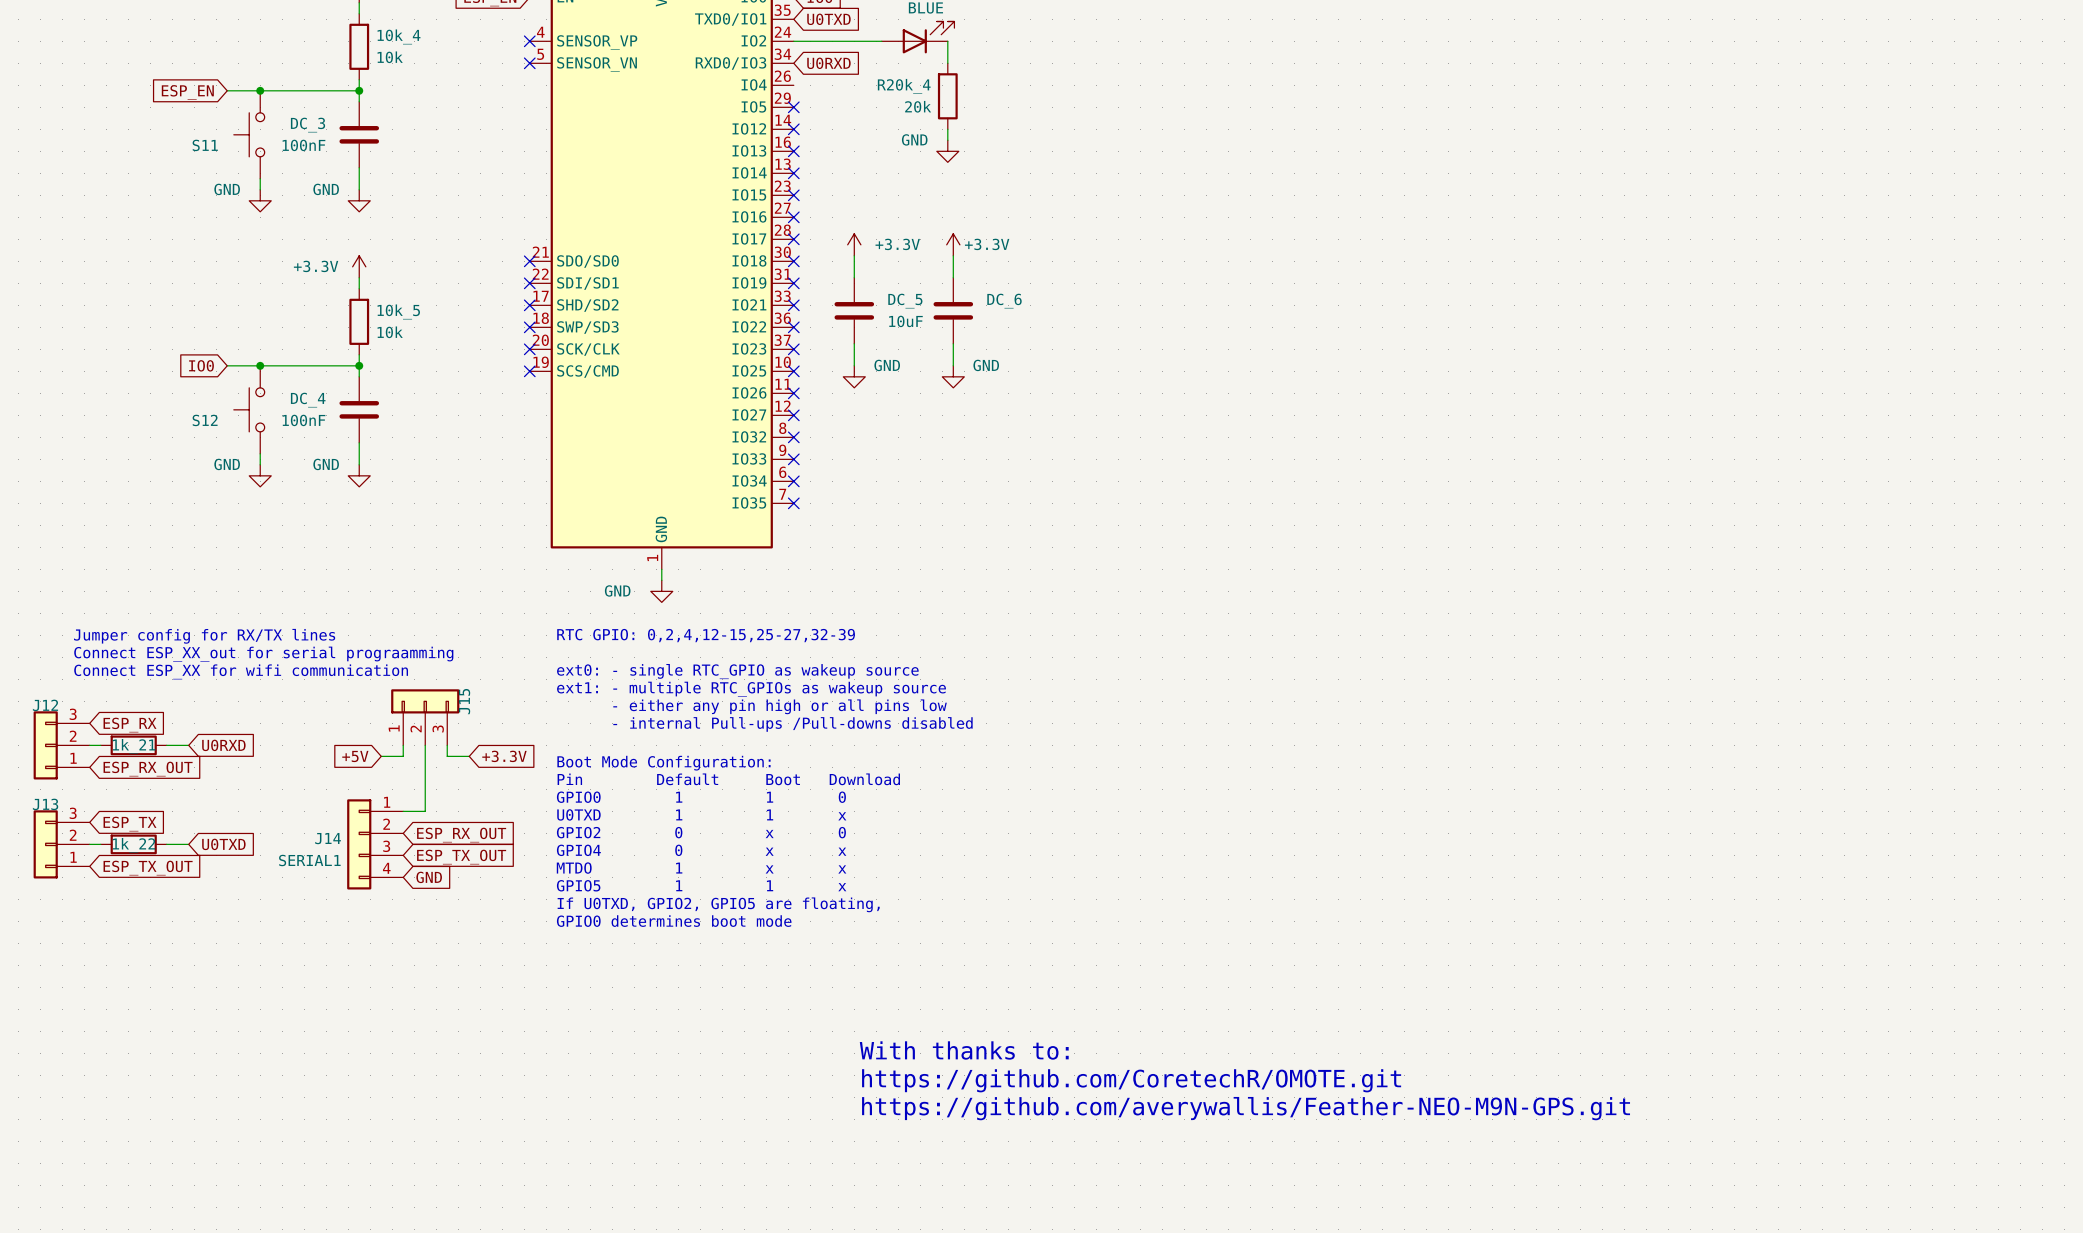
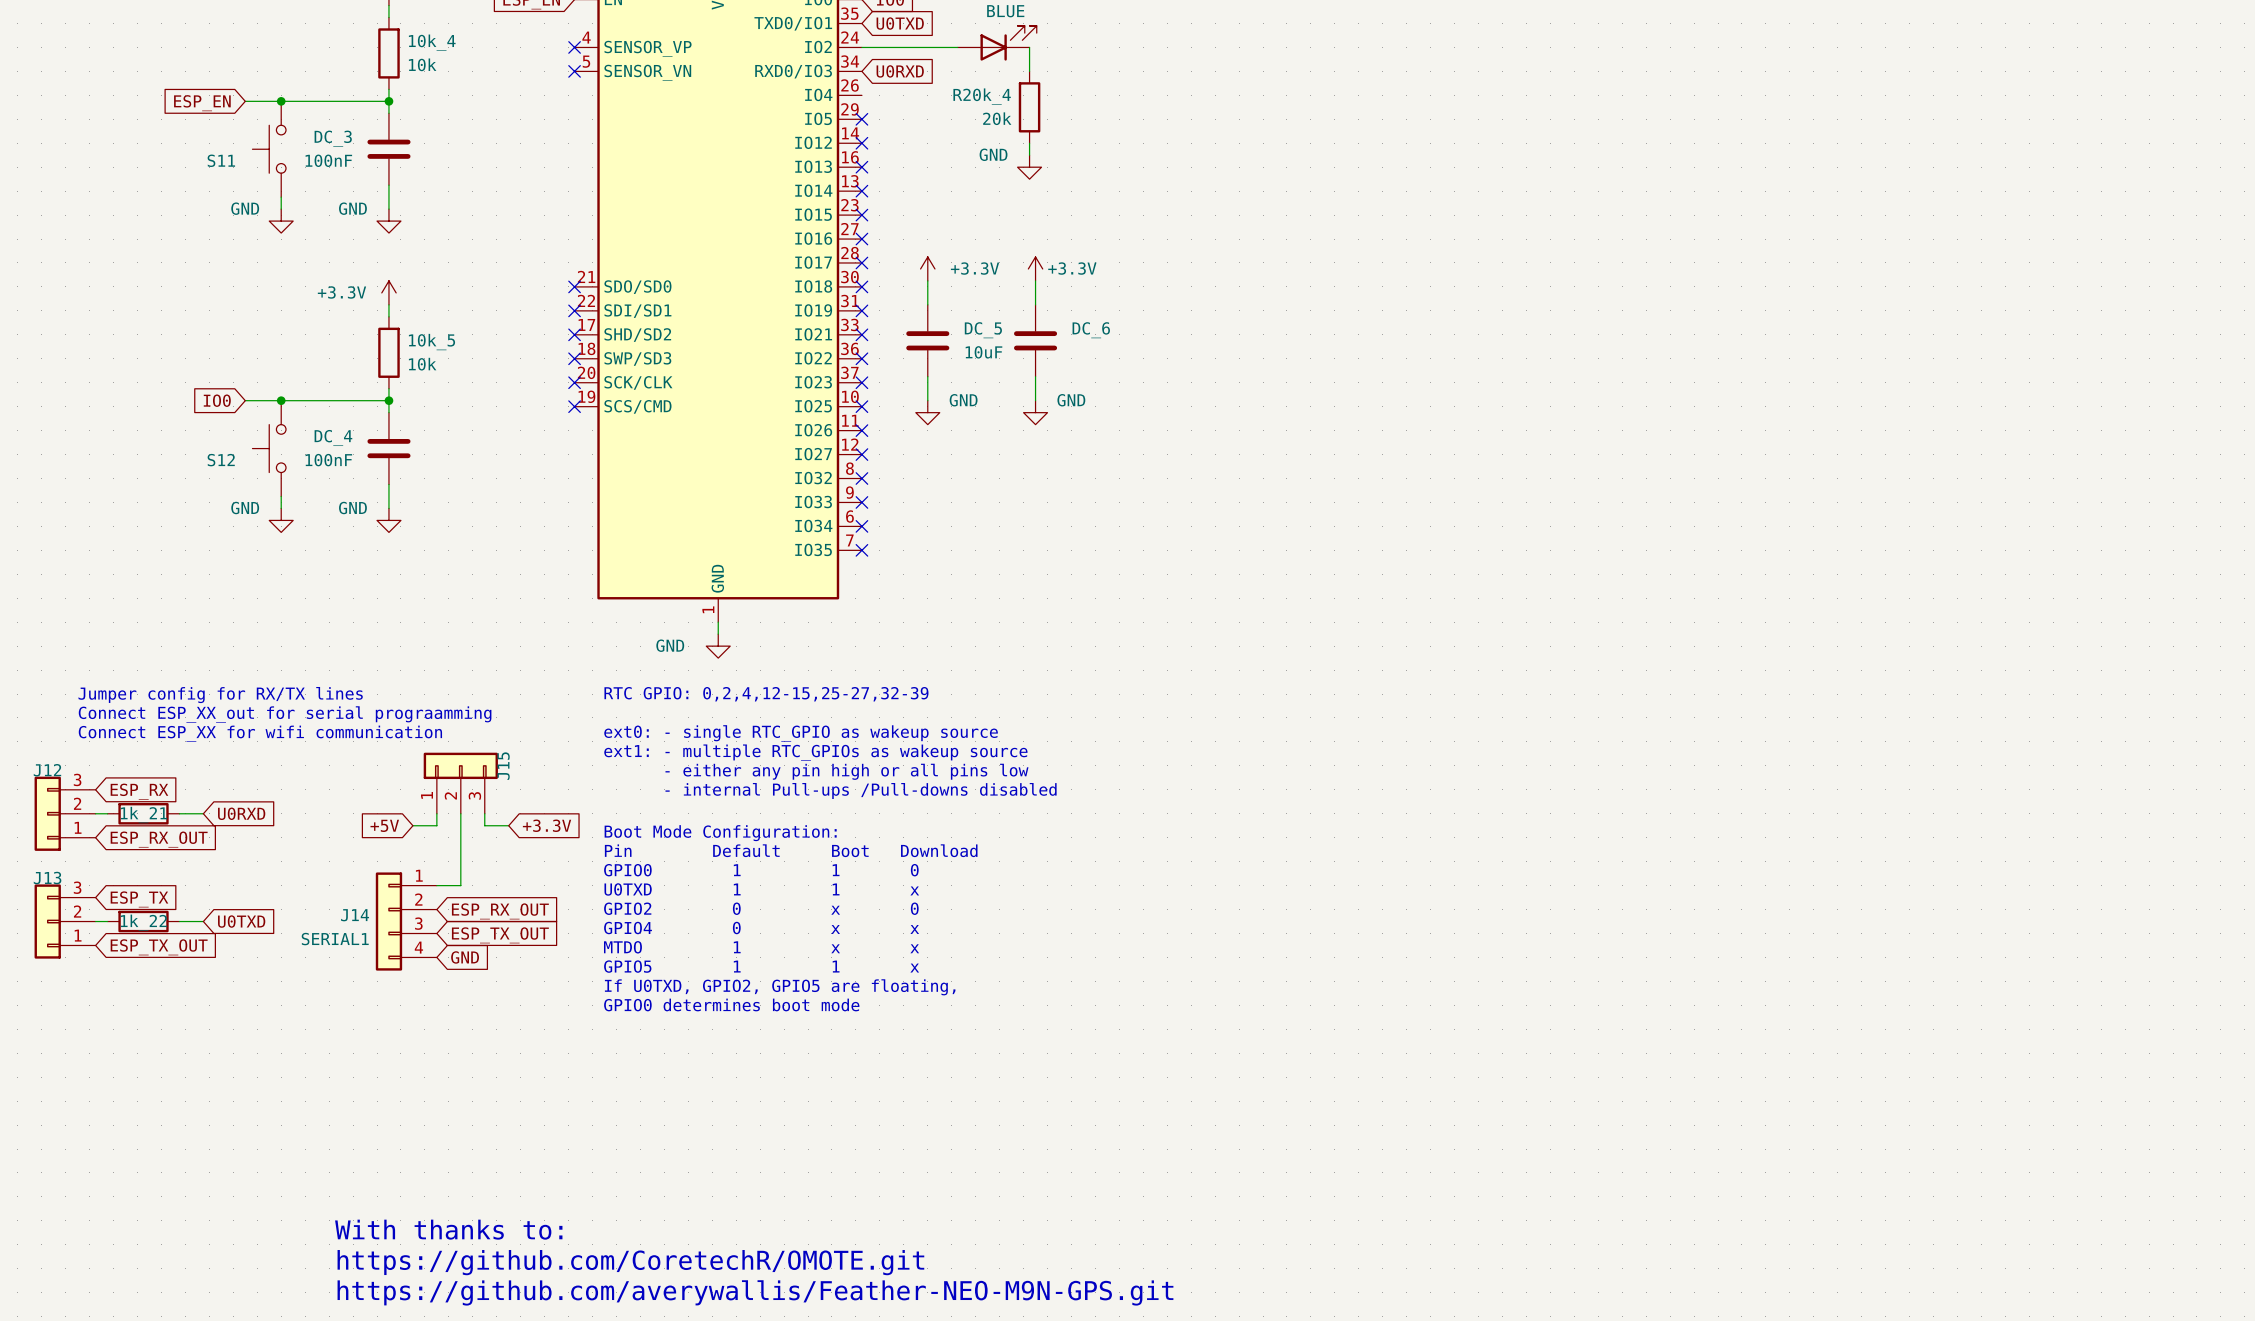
text: With thanks to: (964, 1050) -> none
text: https://github.com/CoretechR/OMOTE.git (1131, 1080) -> none
text: https://github.com/averywallis/Feather-NEO-M9N-GPS.git (1246, 1108) -> none
text: none -> With thanks to: (448, 1229)
text: none -> https://github.com/CoretechR/OMOTE.git (630, 1262)
text: none -> https://github.com/averywallis/Feather-NEO-M9N-GPS.git (755, 1292)

